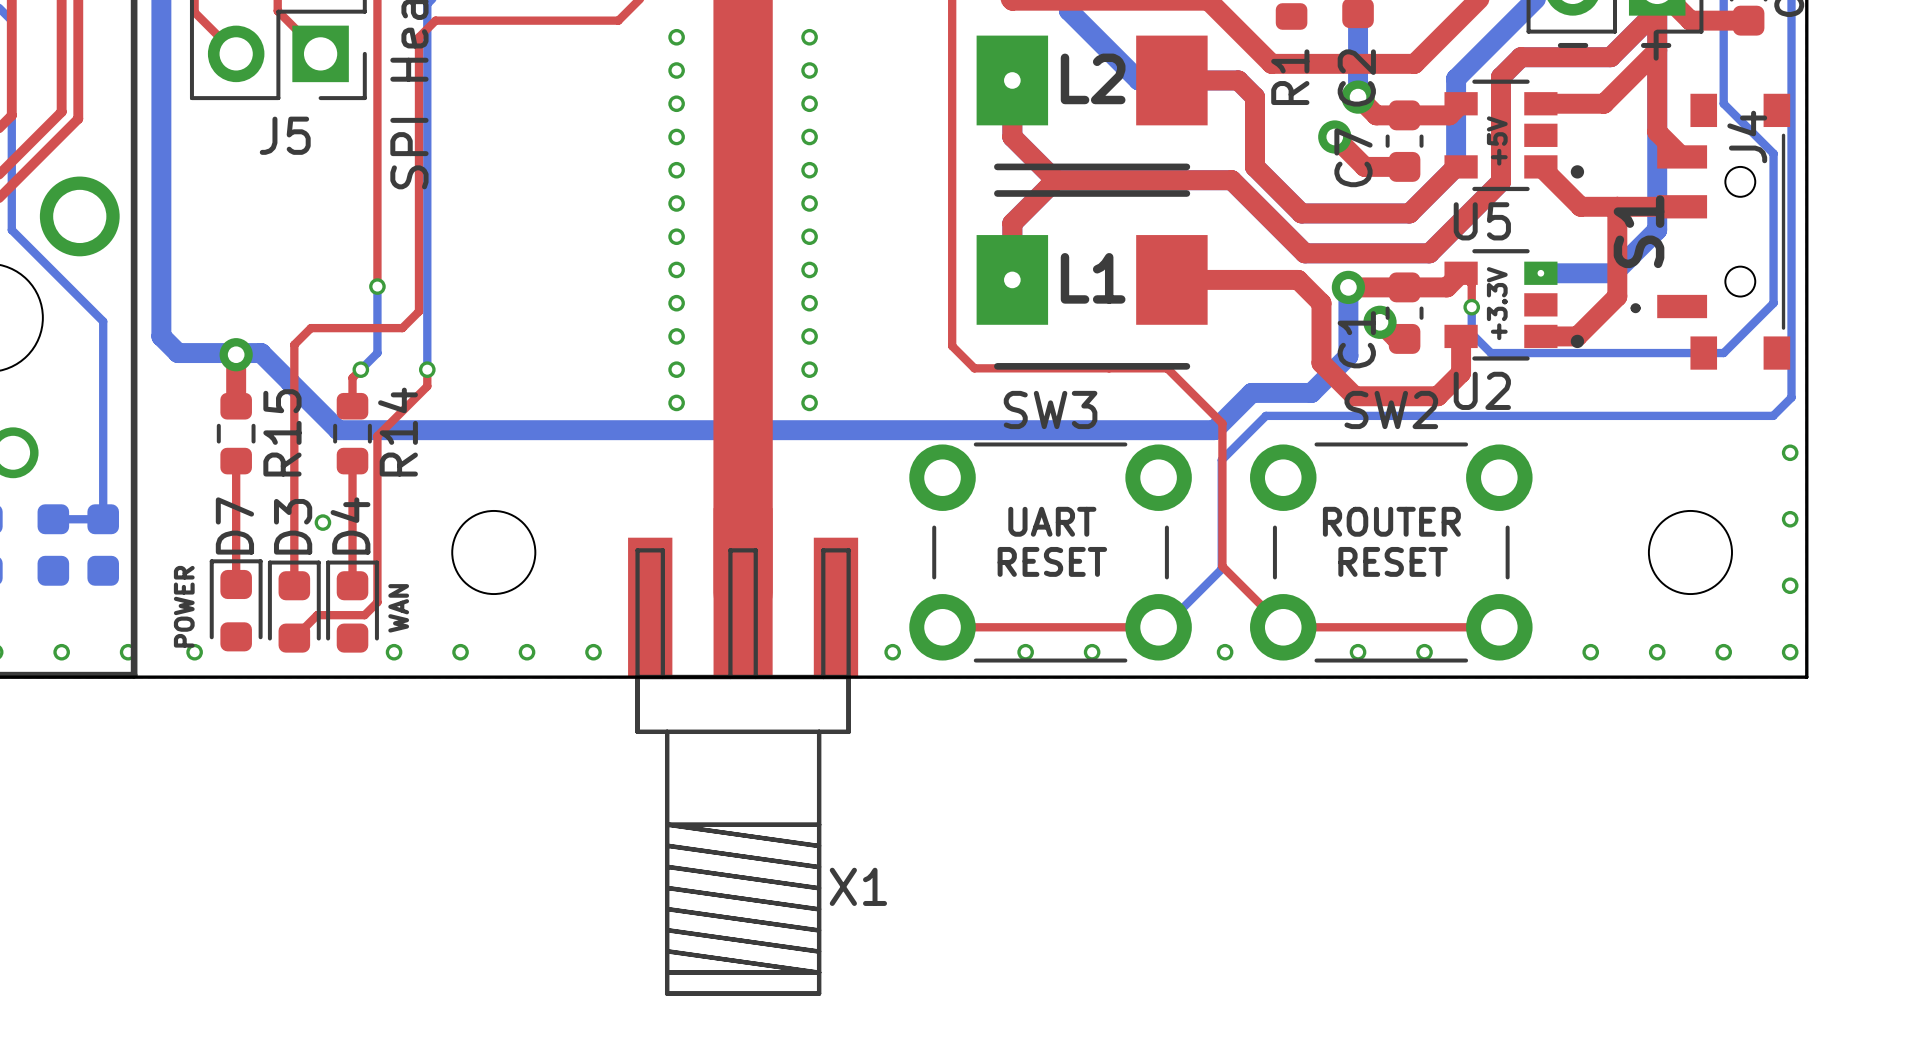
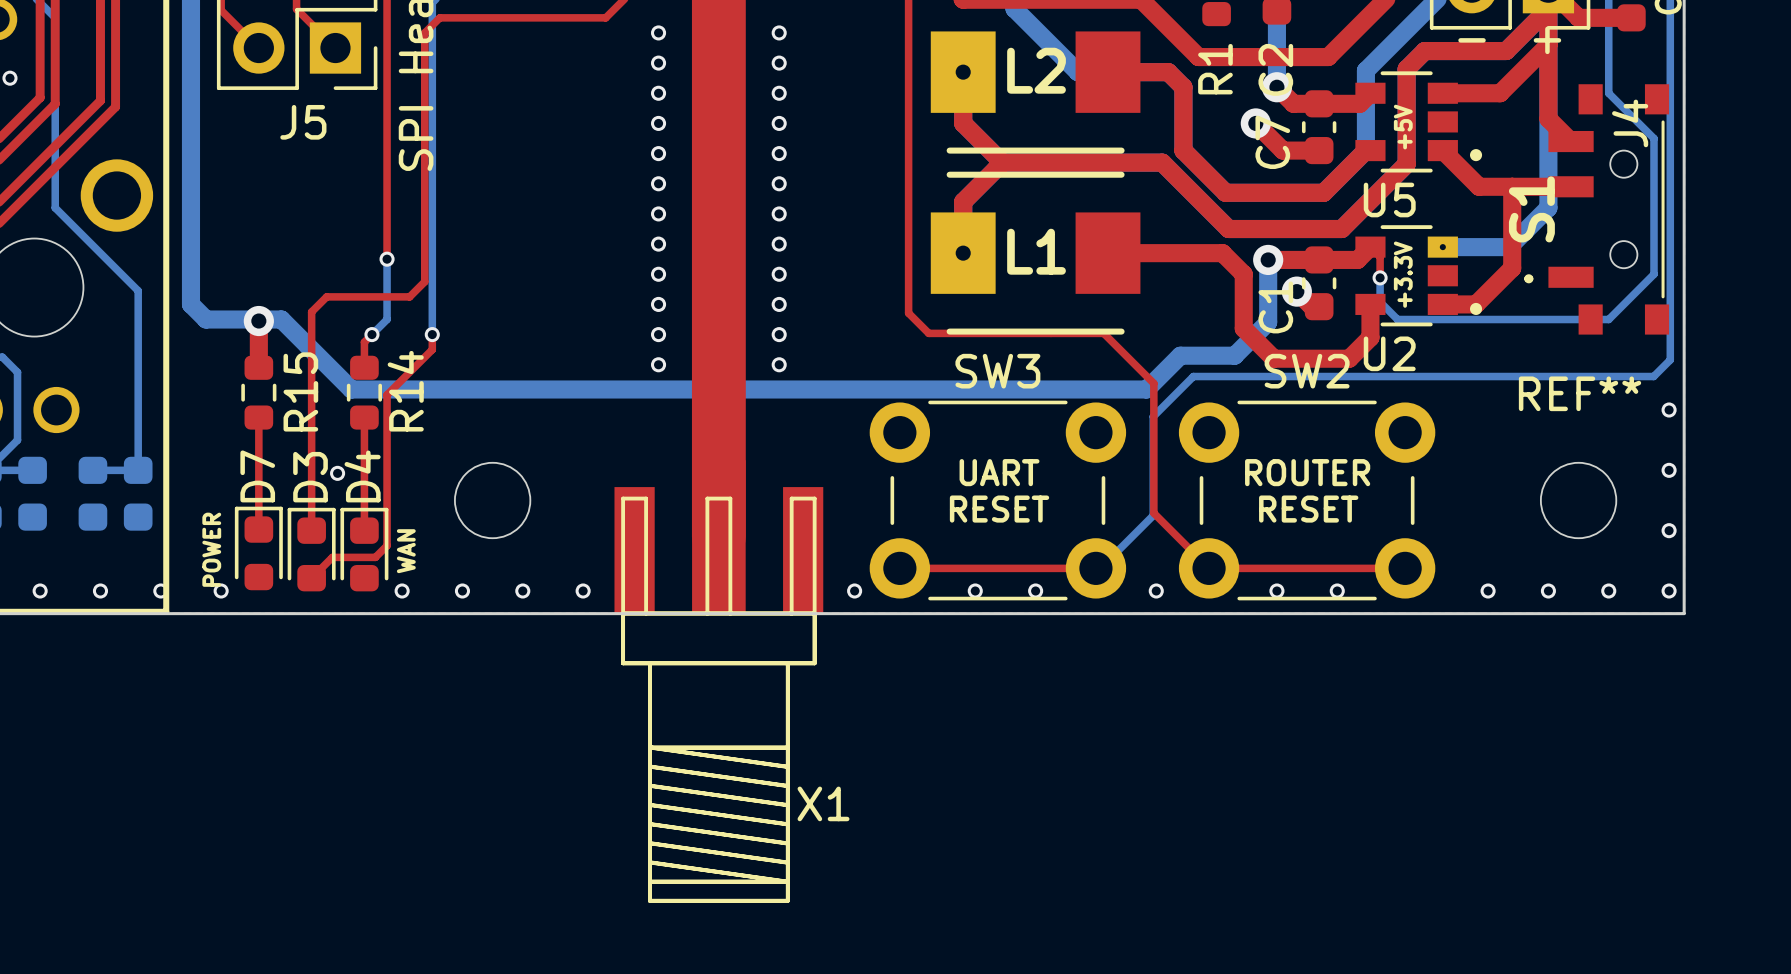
REF** name: none -> REF** (1580, 393)

